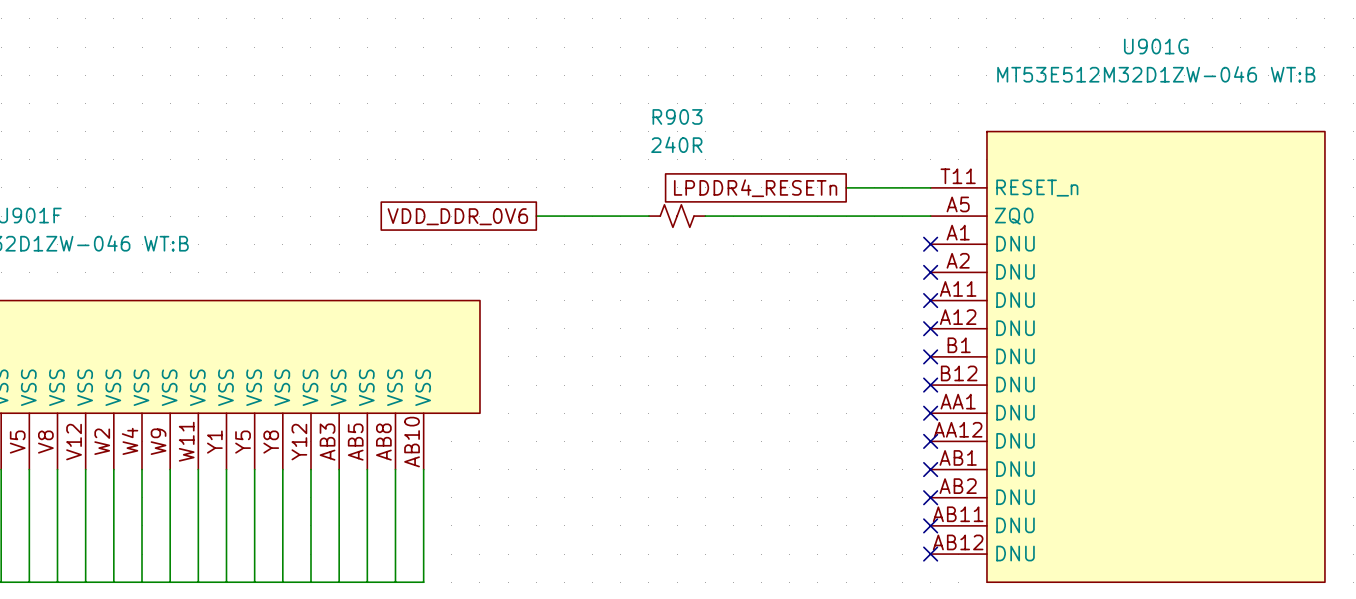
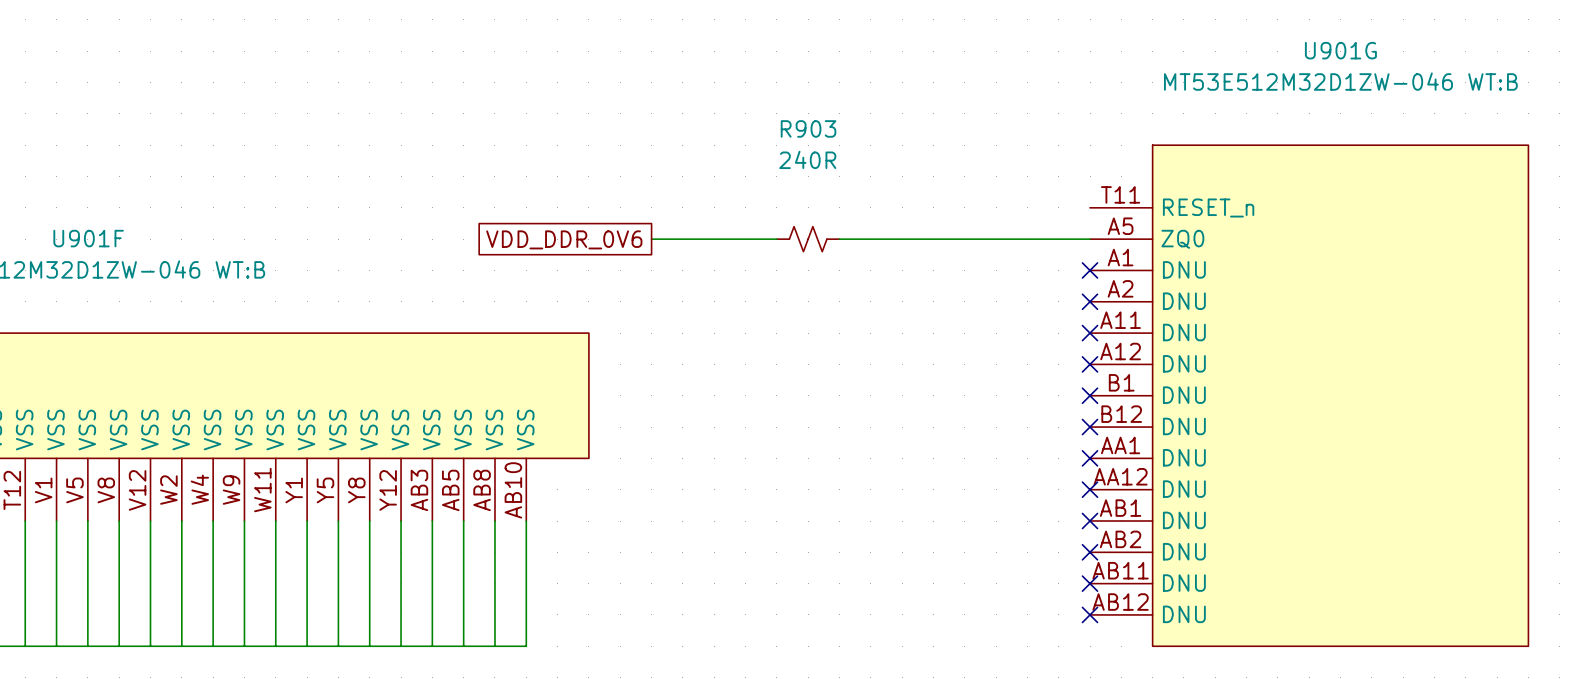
wire: (846, 187) (930, 187) -> none
global label: LPDDR4_RESETn (755, 188) -> none

